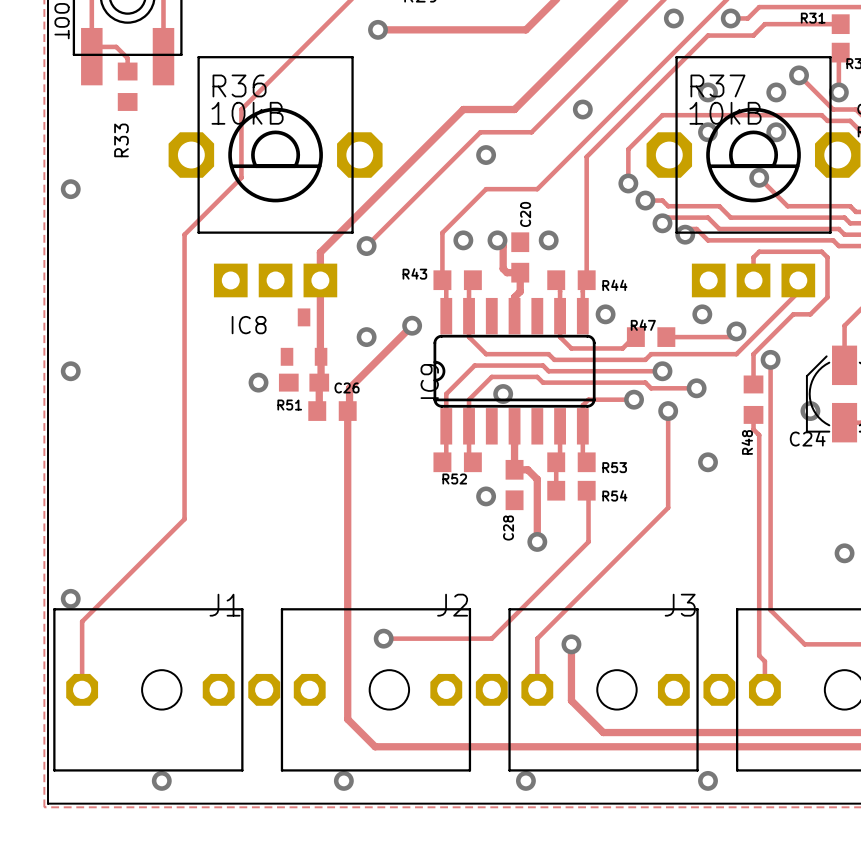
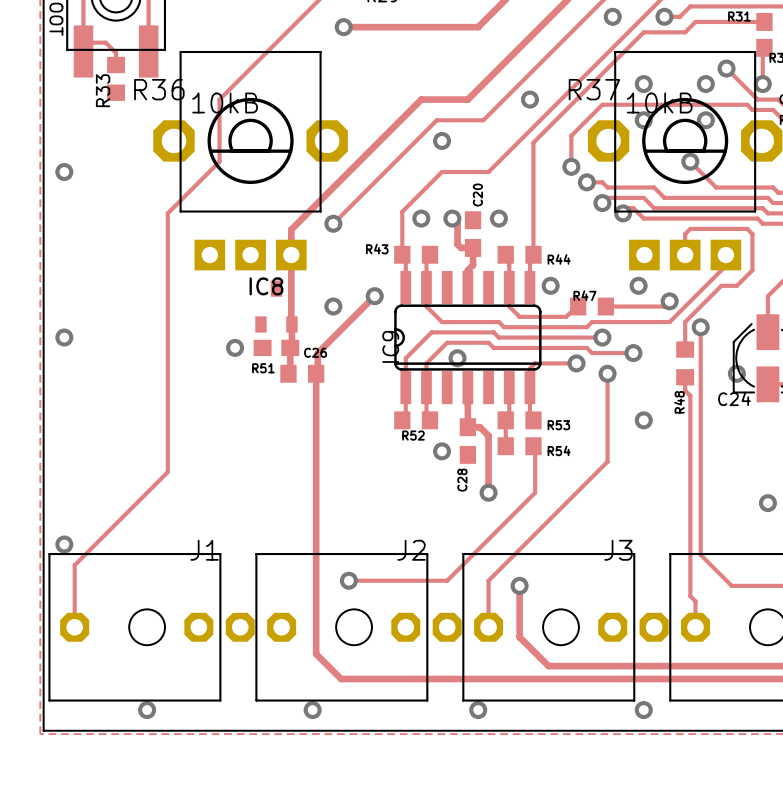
R36 name position: R36 (239, 85) -> R36 (159, 89)
R37 name position: R37 (717, 85) -> R37 (594, 89)
R33 name position: R33 (121, 140) -> R33 (103, 90)
IC8 name position: IC8 (249, 325) -> IC8 (266, 286)

